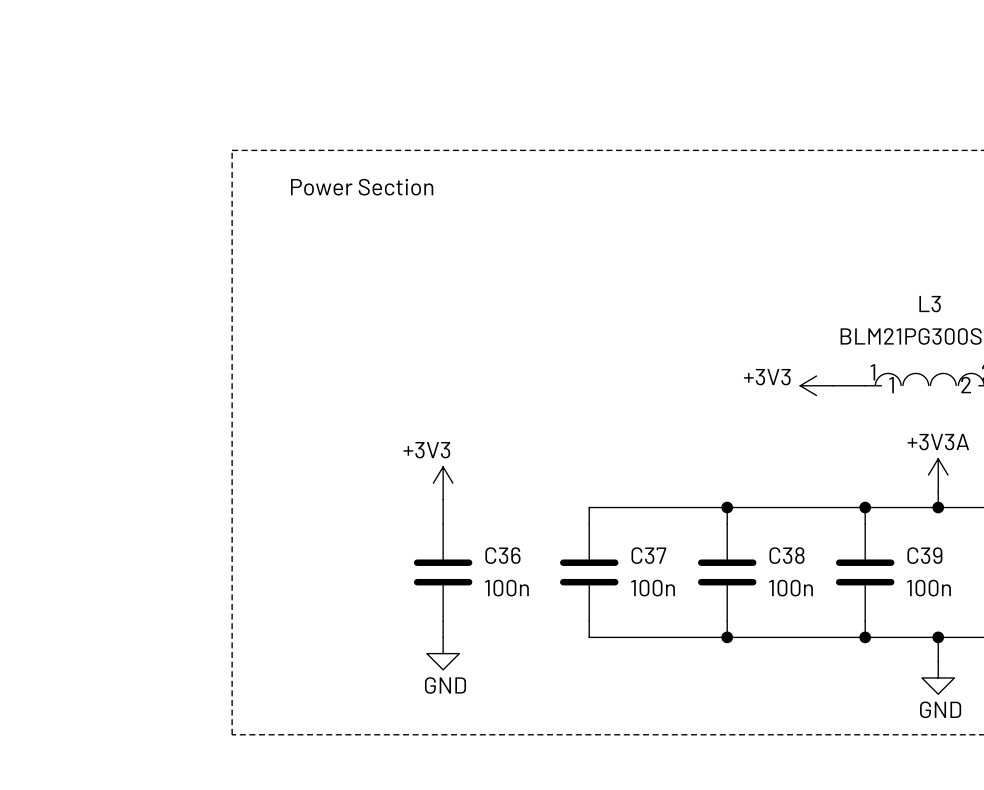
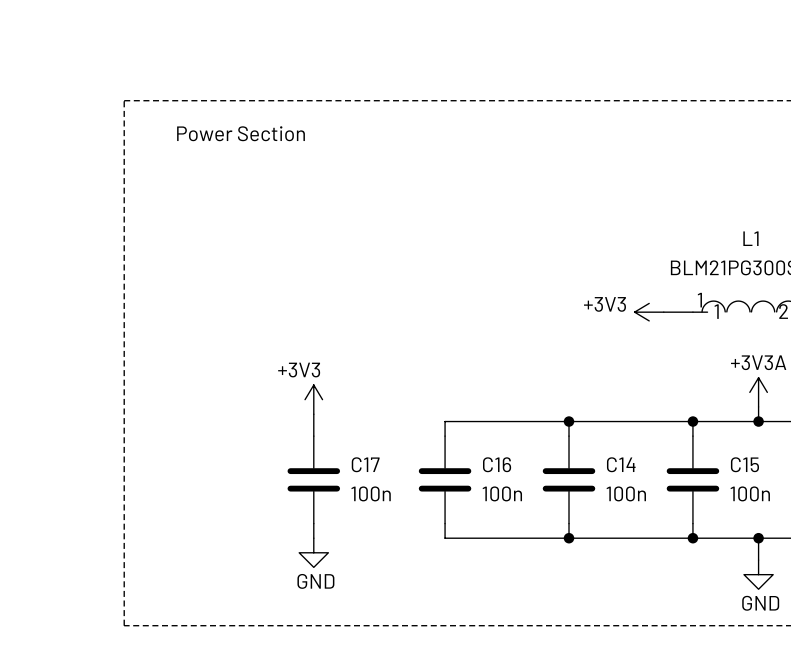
L3 name: L3 (930, 304) -> L1 (750, 238)
C36 name: C36 (502, 555) -> C17 (365, 464)
C37 name: C37 (648, 555) -> C16 (497, 464)
C38 name: C38 (786, 555) -> C14 (621, 464)
C39 name: C39 (924, 555) -> C15 (744, 464)

